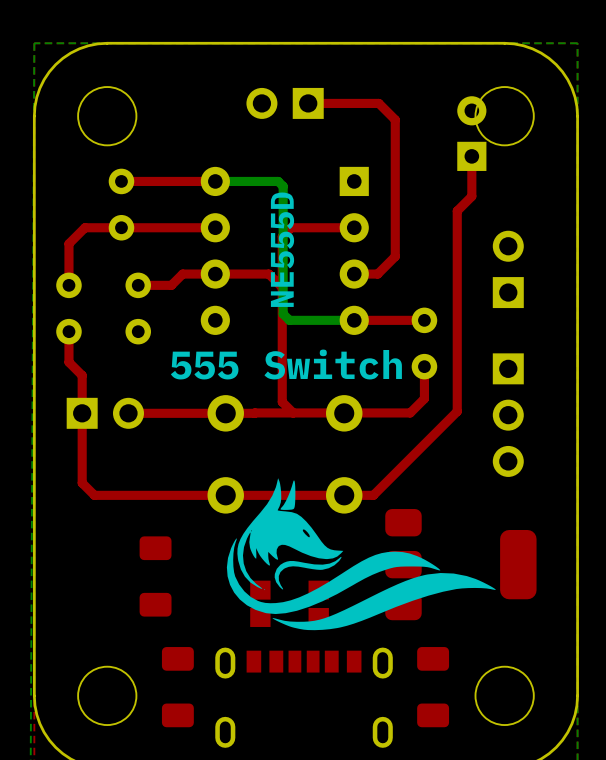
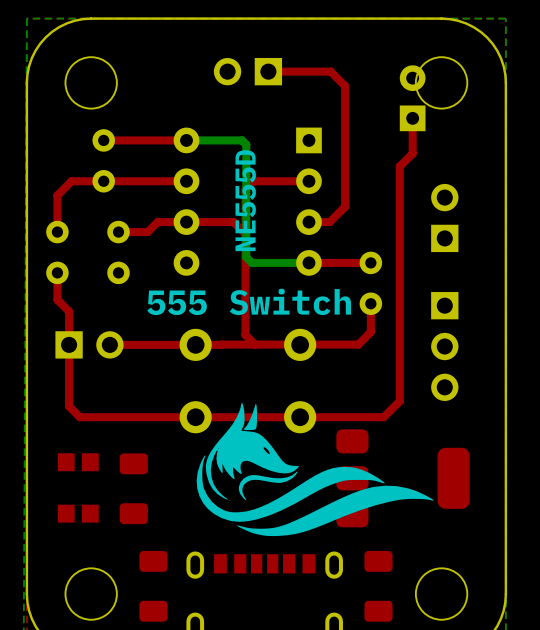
top track: (457, 411) (373, 495) -> (399, 343) (399, 401) (383, 417) (325, 417)
part rotation: 0° (289, 603) -> 90° clockwise (78, 487)
part position: (289, 603) -> (78, 487)

